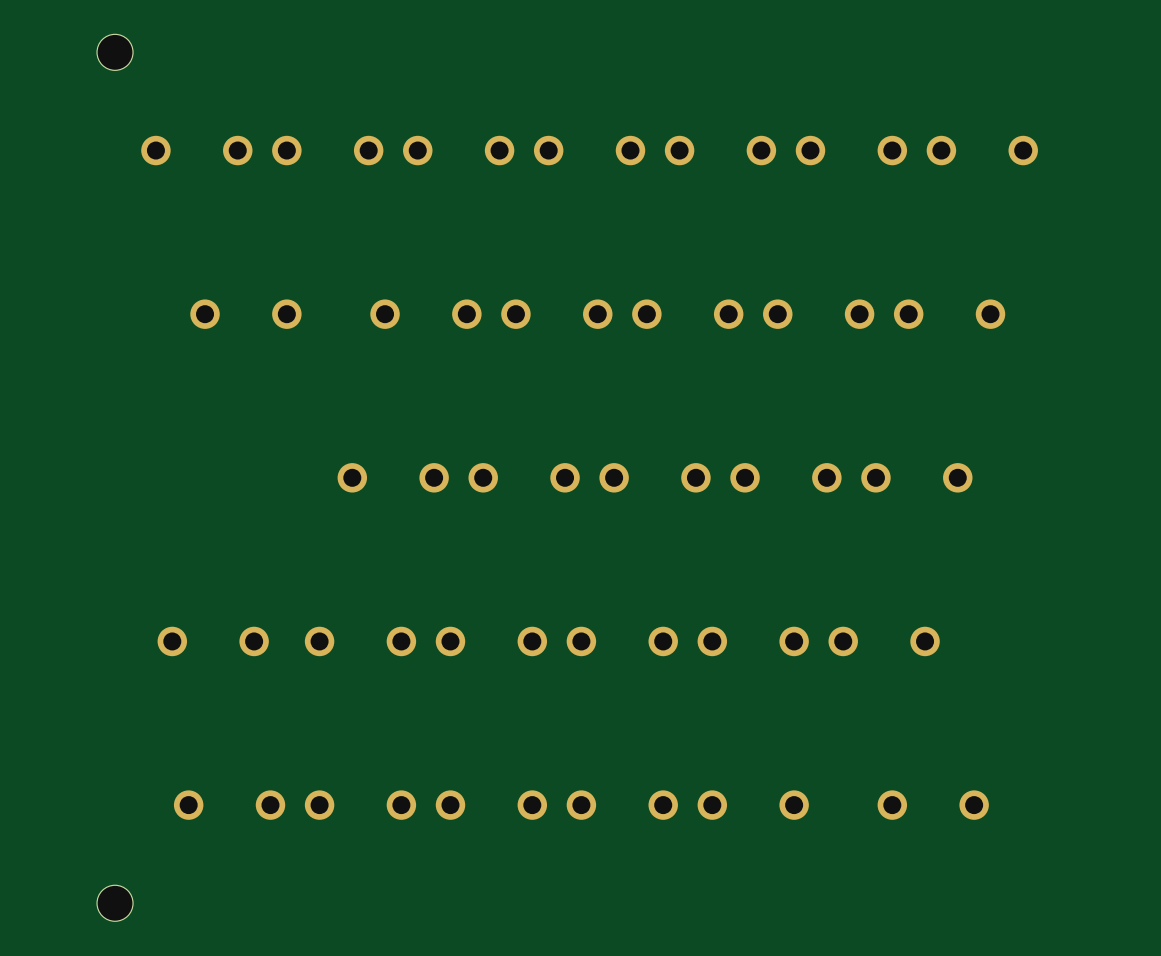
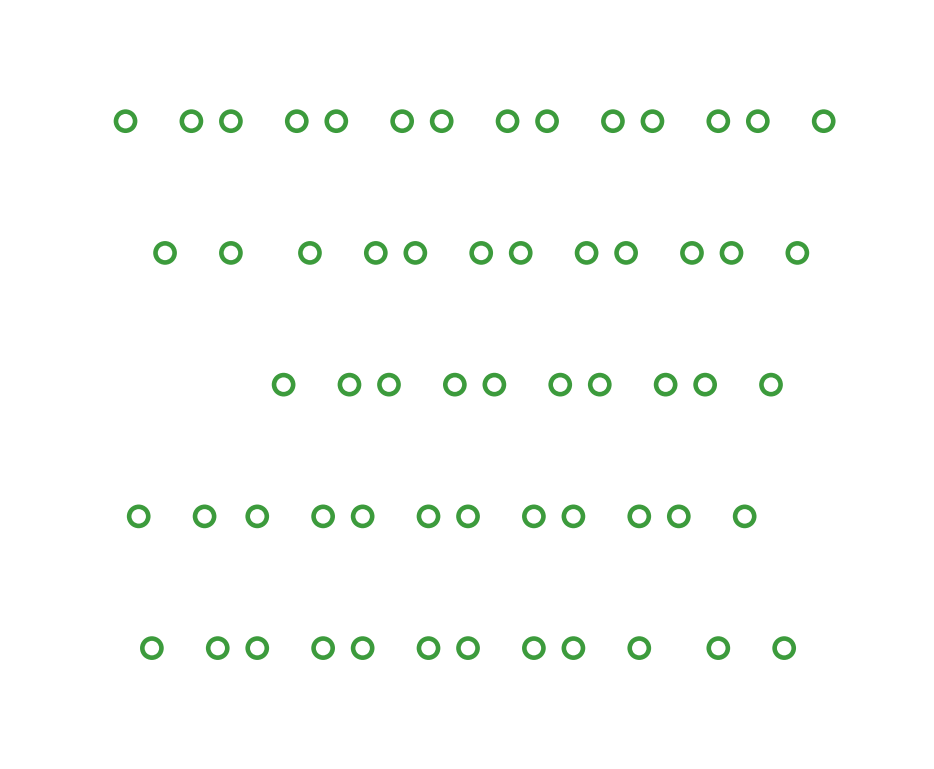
part: (115, 52) -> none
part: (115, 903) -> none

